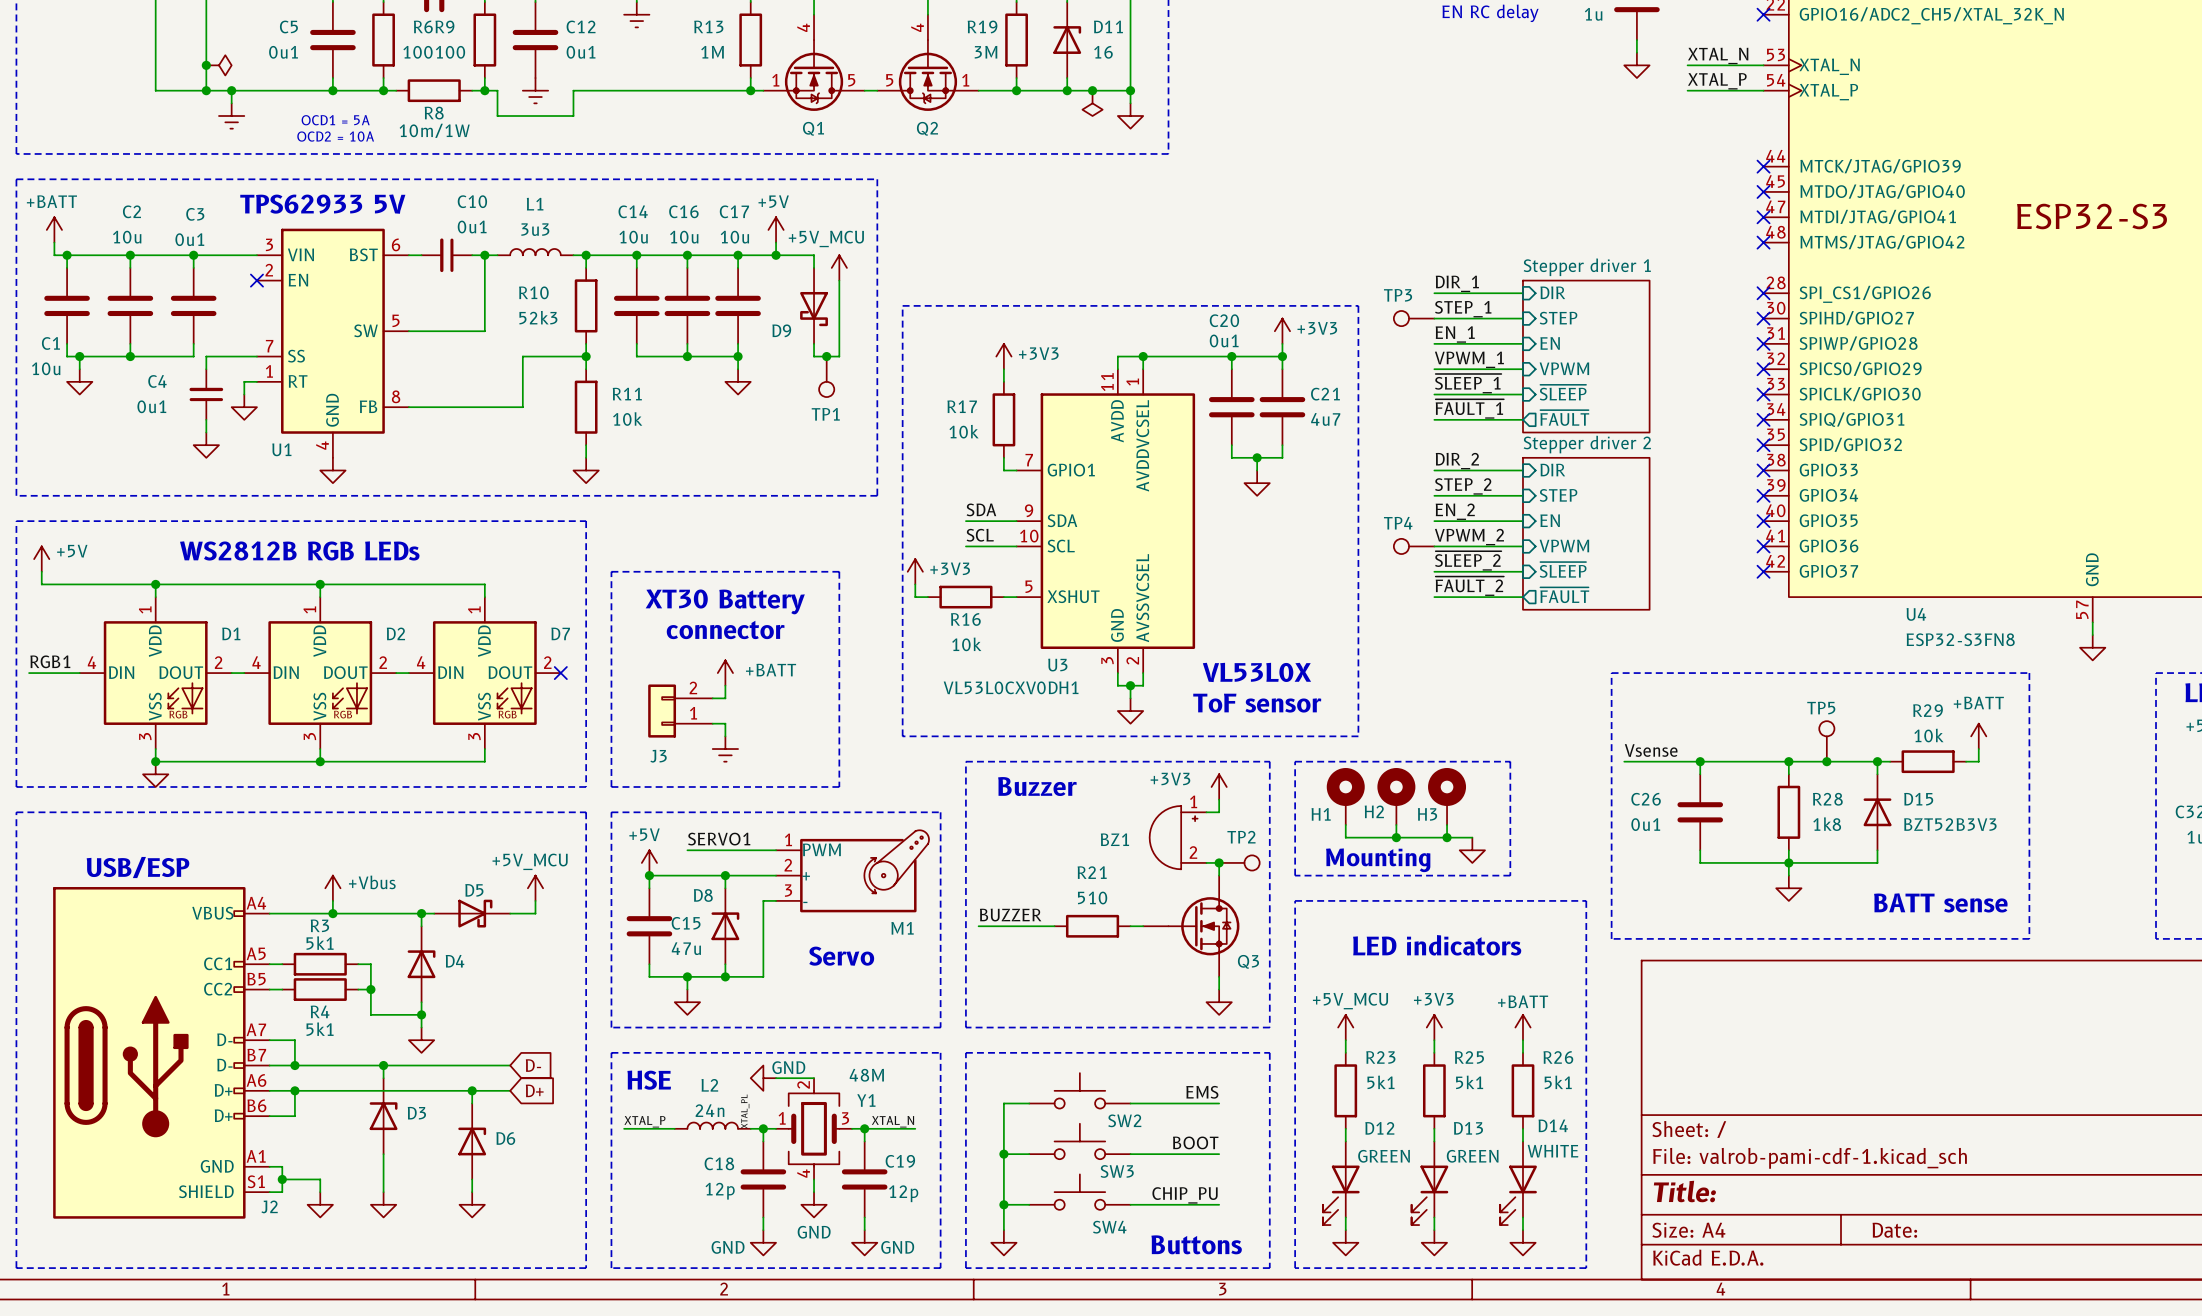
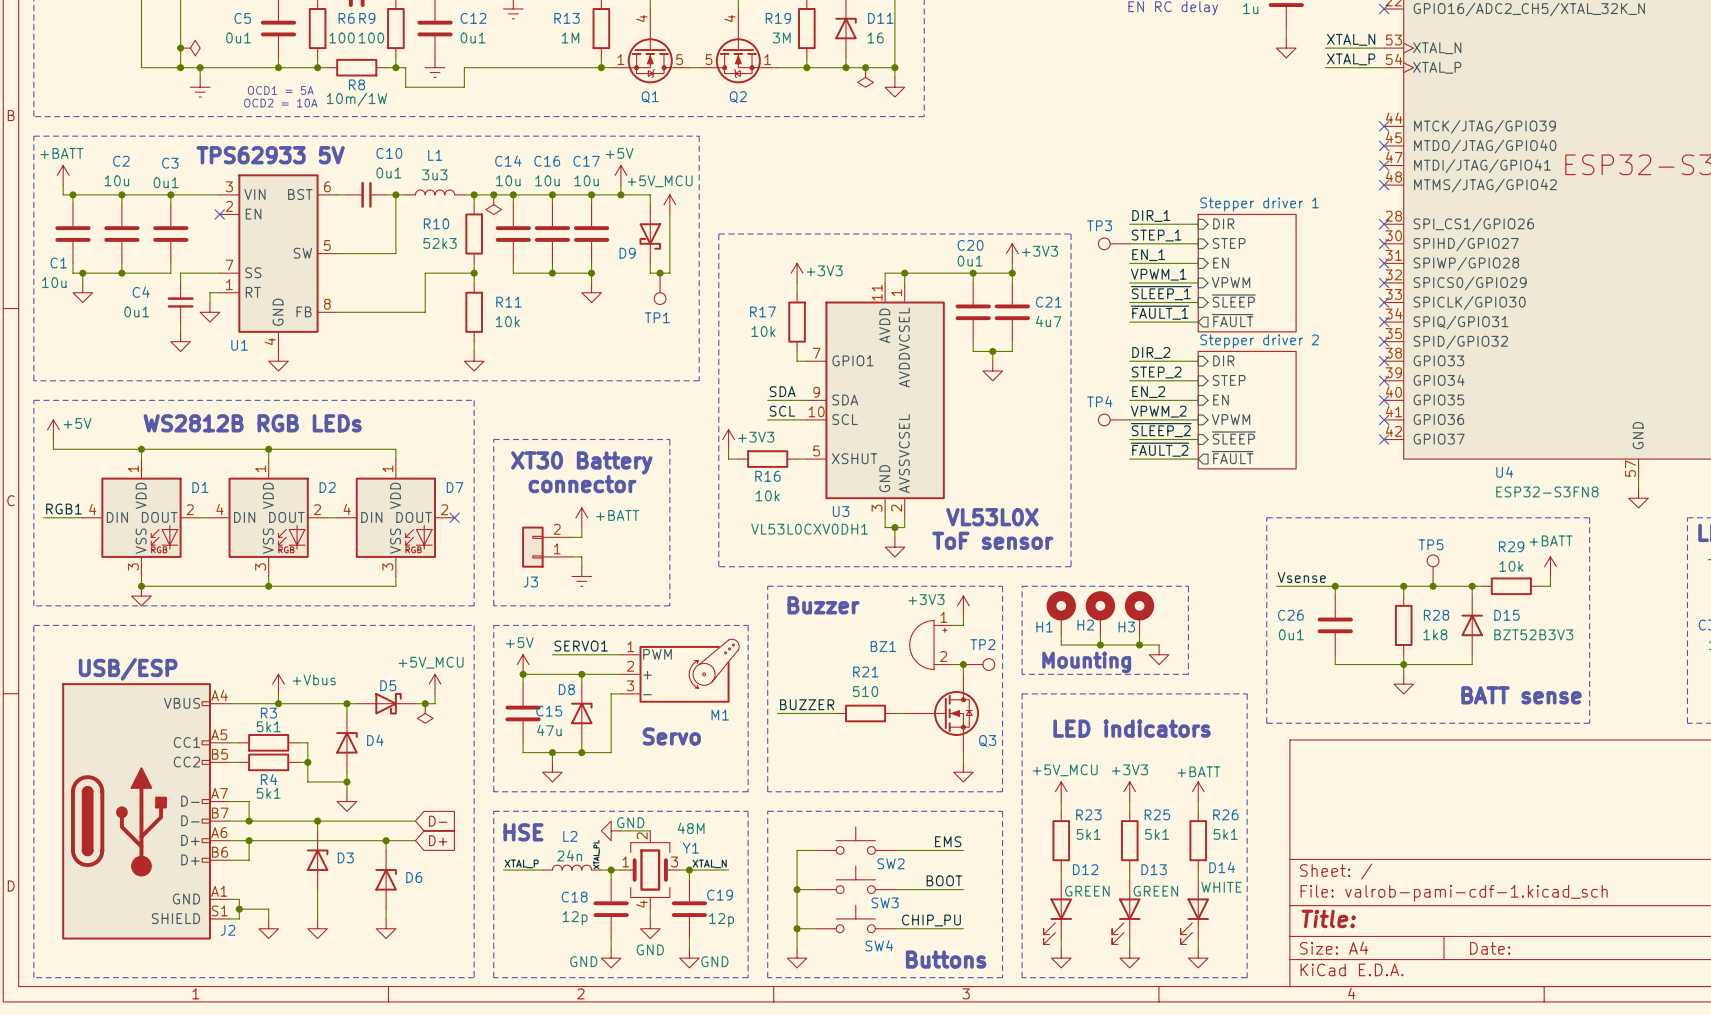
junction: none -> (493, 194)
power symbol: none -> (493, 204)
junction: none -> (425, 703)
power symbol: none -> (425, 713)

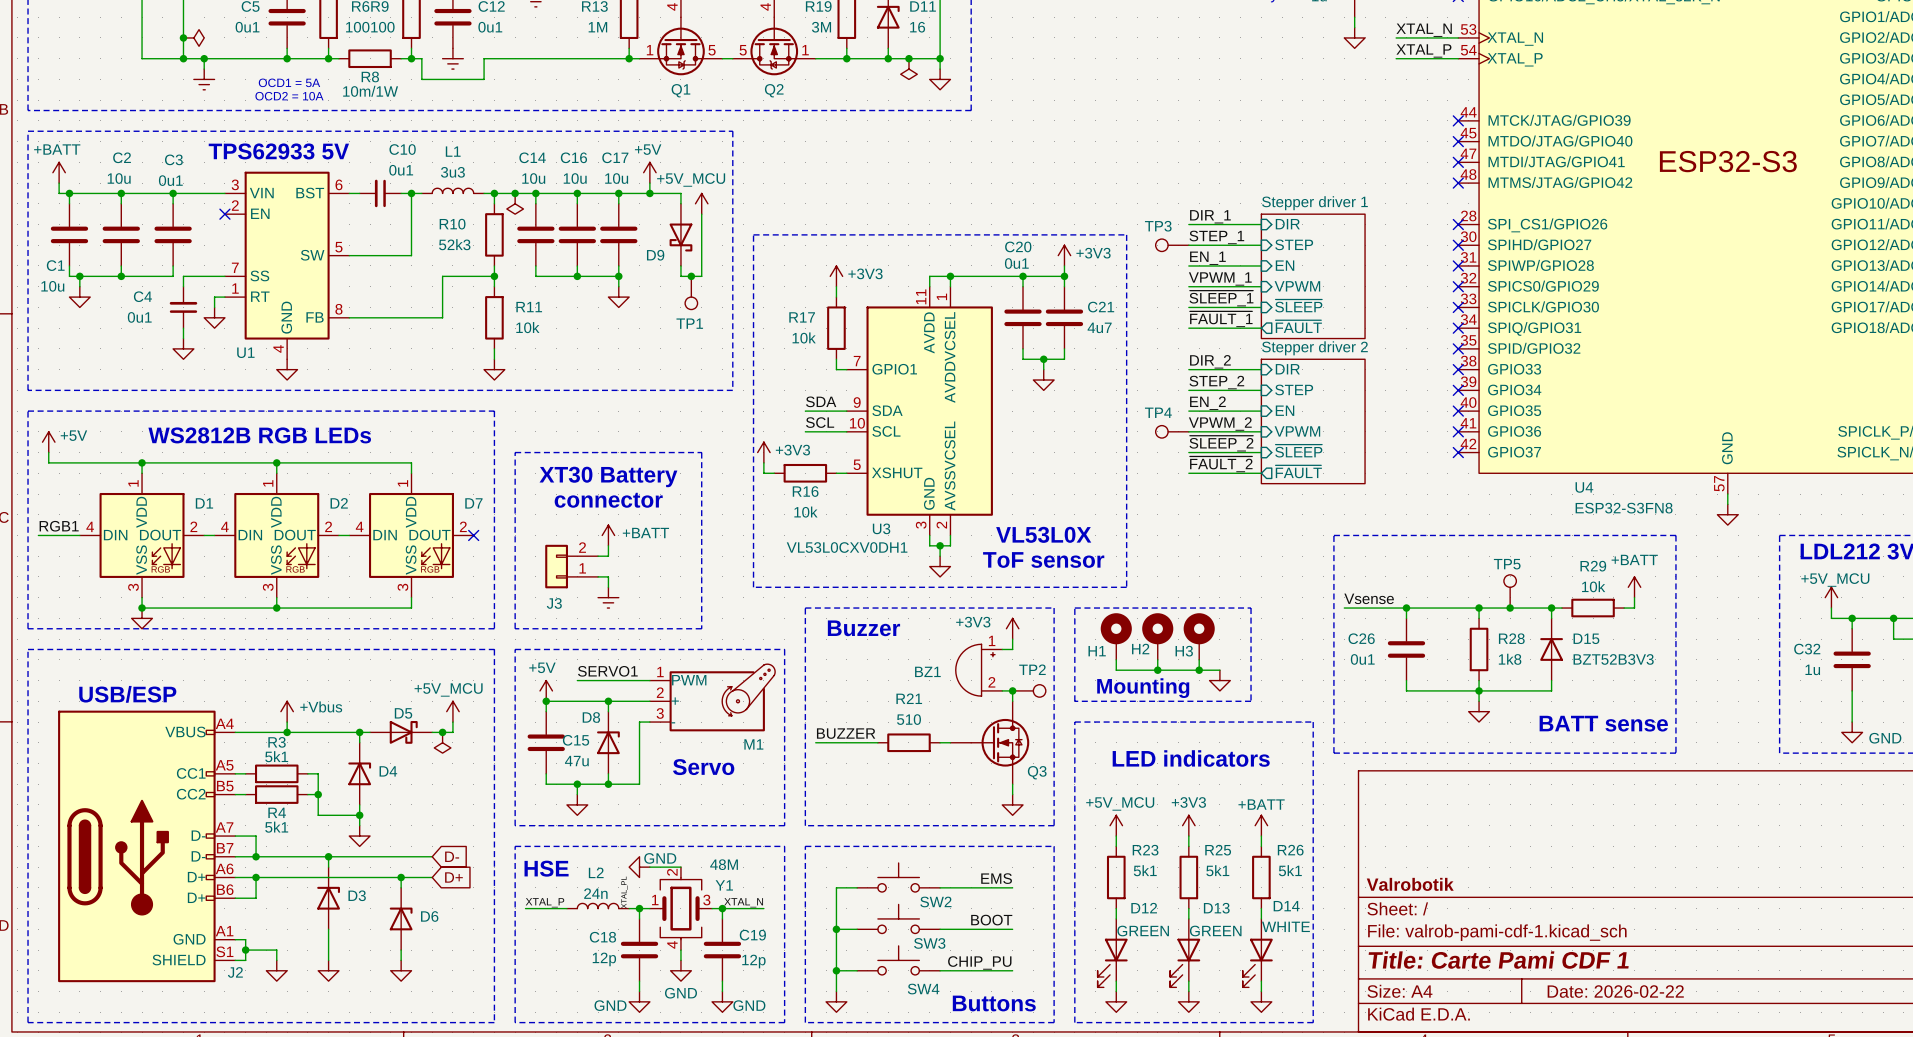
title block: none -> Valrobotik (1410, 884)
title block: Title: (1328, 918) -> Title: Carte Pami CDF 1 (1498, 960)
title block: Date: (1490, 948) -> Date: 2026-02-22 (1615, 991)

